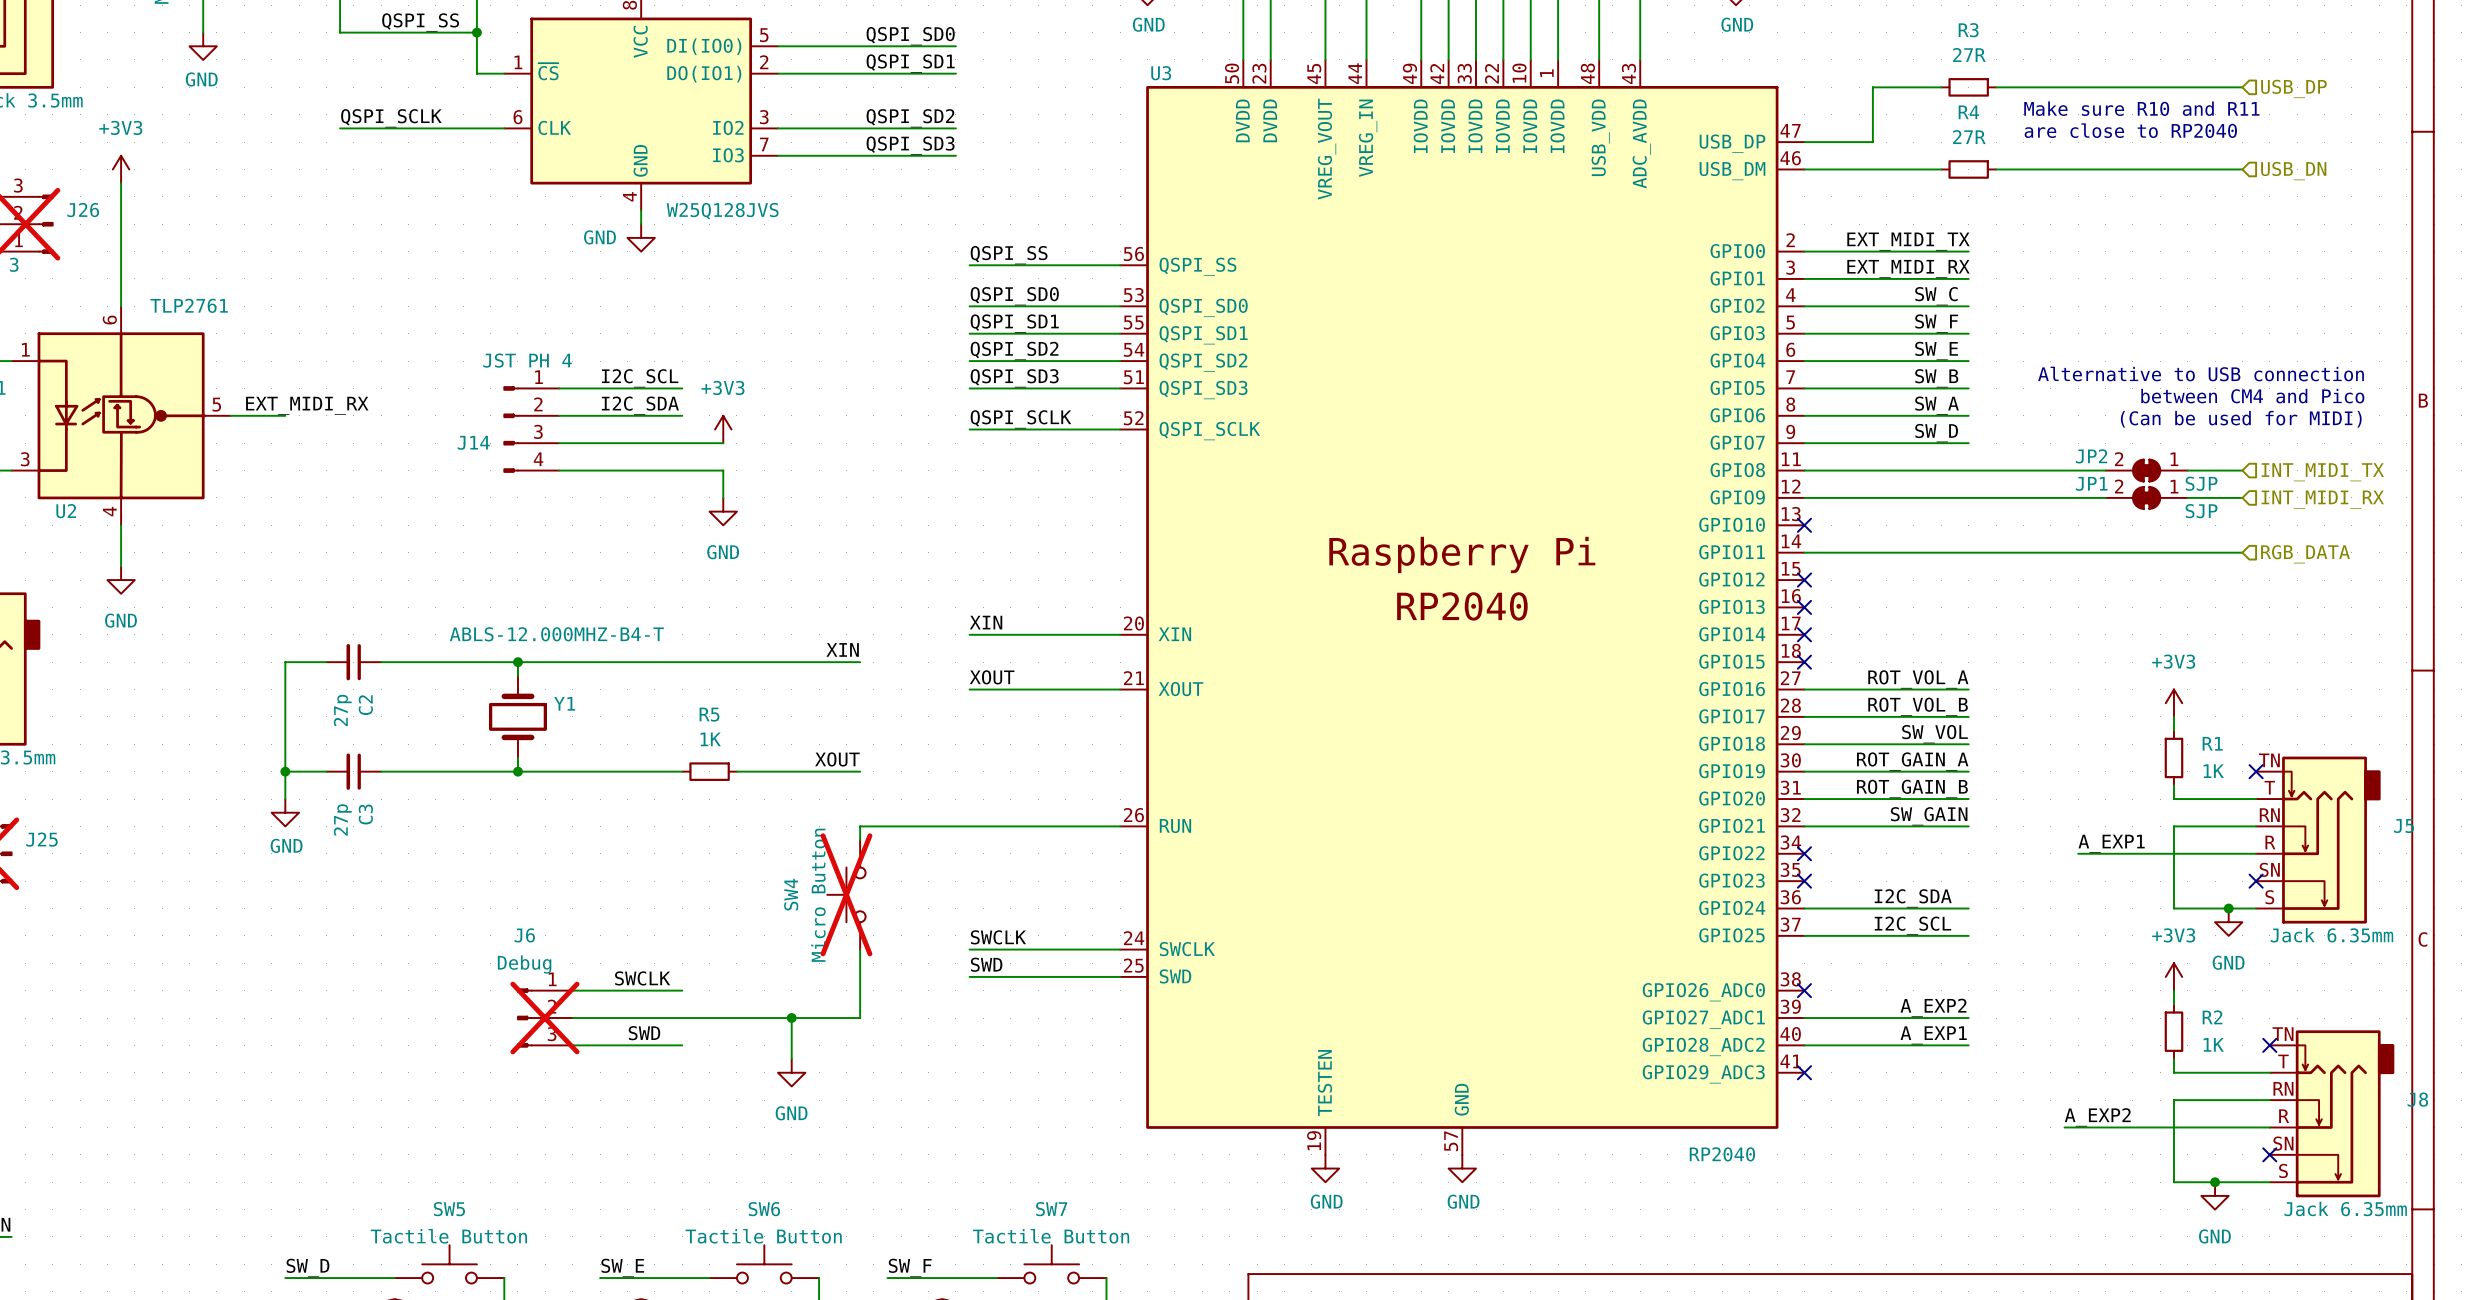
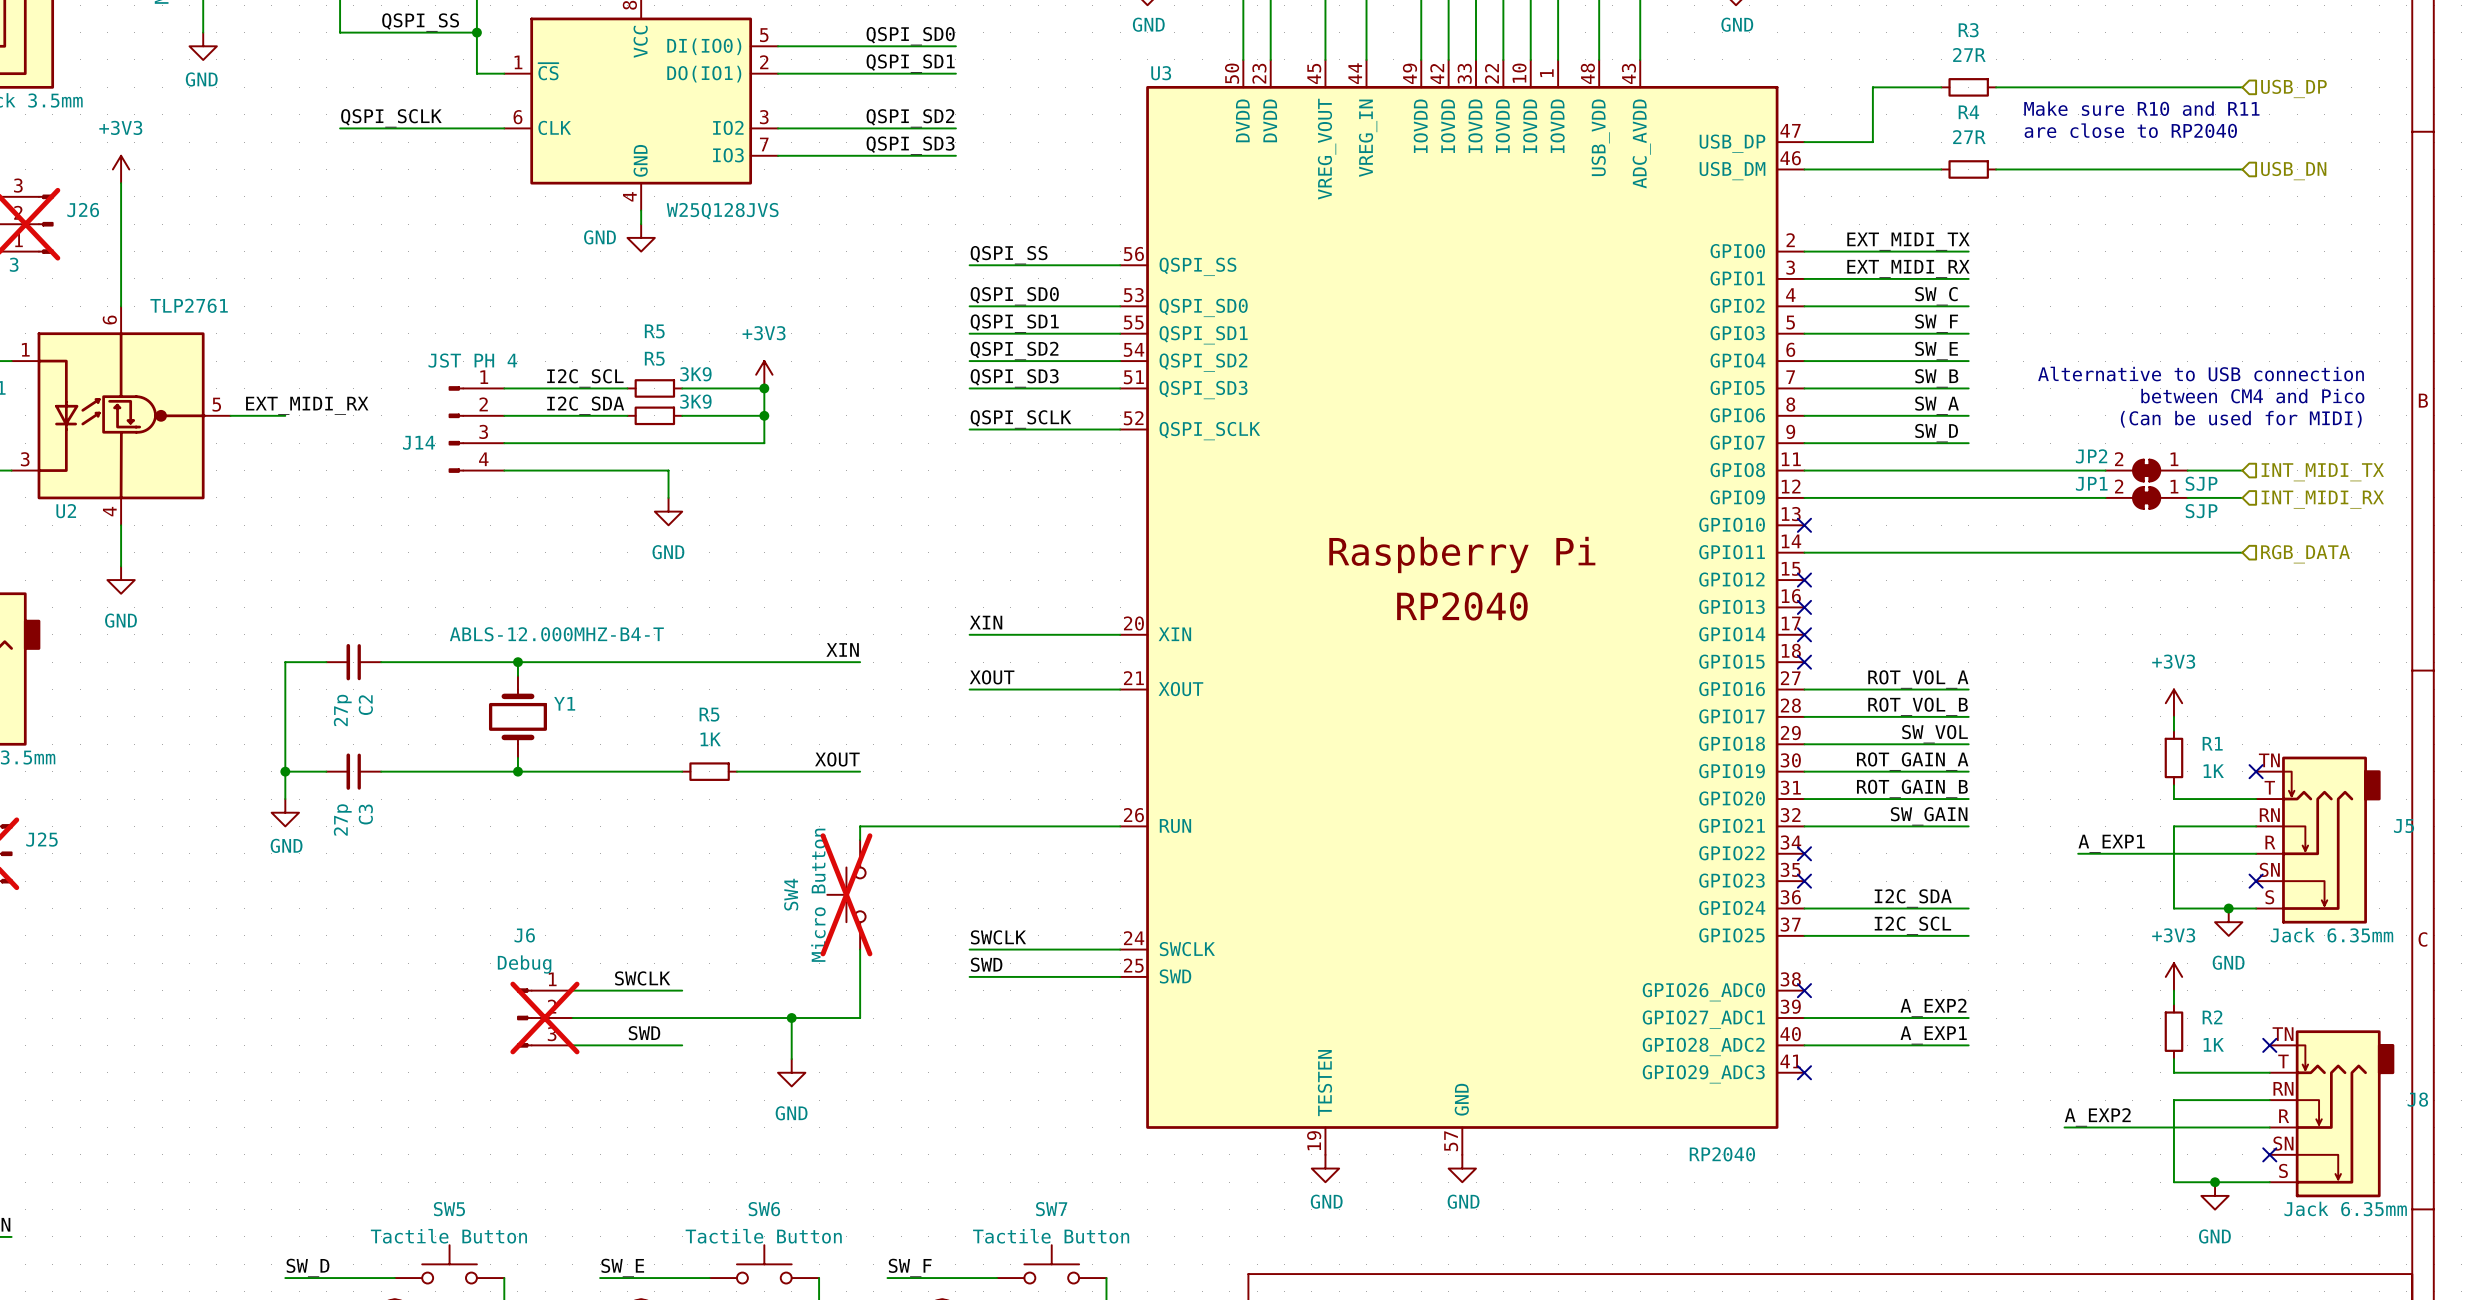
label position: I2C_SCL (640, 378) -> I2C_SCL (585, 378)
wire: (627, 388) (682, 388) -> (723, 443) (764, 443) (764, 388) (682, 388)
R5: none -> 3K9 (654, 388)
junction: none -> (764, 388)
label position: I2C_SDA (640, 405) -> I2C_SDA (585, 405)
wire: (627, 415) (682, 415) -> (764, 415) (682, 415)
R5: none -> 3K9 (654, 415)
junction: none -> (764, 415)
J14 position: (531, 429) -> (476, 429)
power symbol position: +3V3 (723, 429) -> +3V3 (764, 374)
wire: (668, 470) (723, 470) (723, 497) -> (668, 470) (668, 497)
power symbol position: GND (723, 511) -> GND (668, 511)

